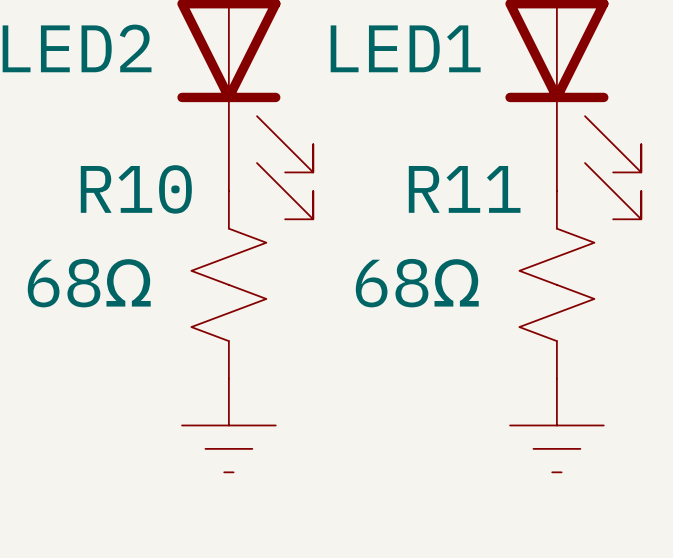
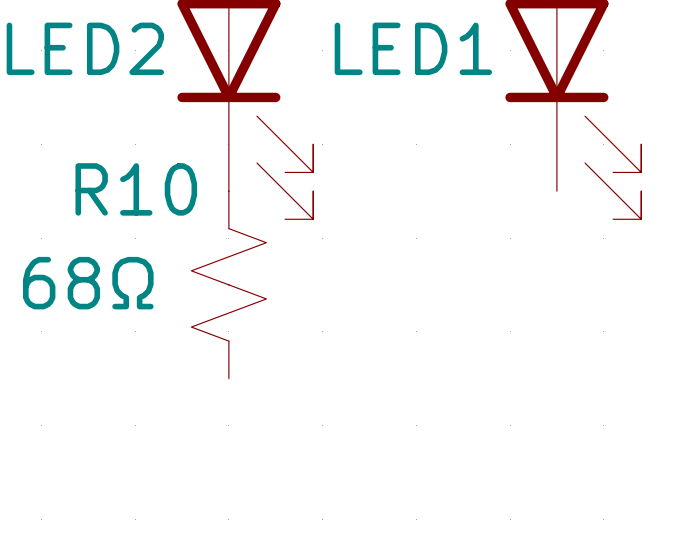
R11: 68Ω (556, 284) -> none
power symbol: (228, 425) -> none
power symbol: (556, 425) -> none

